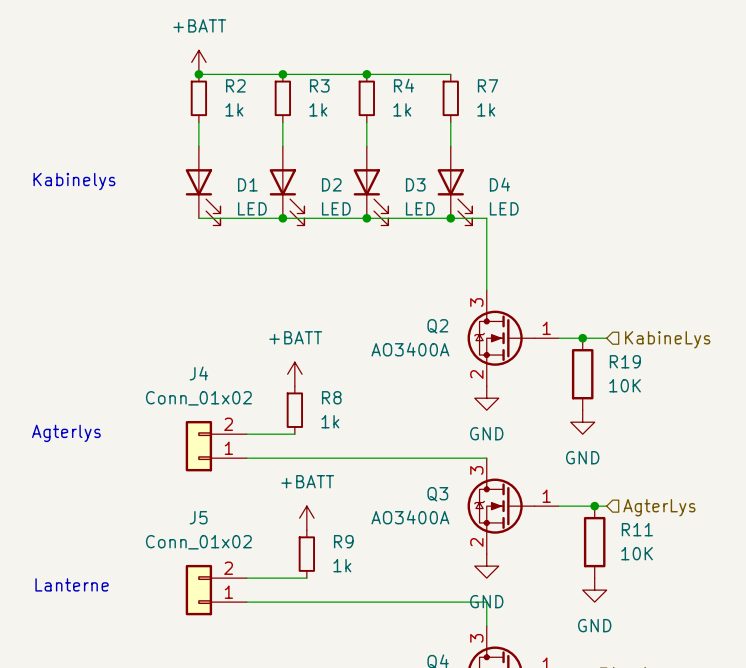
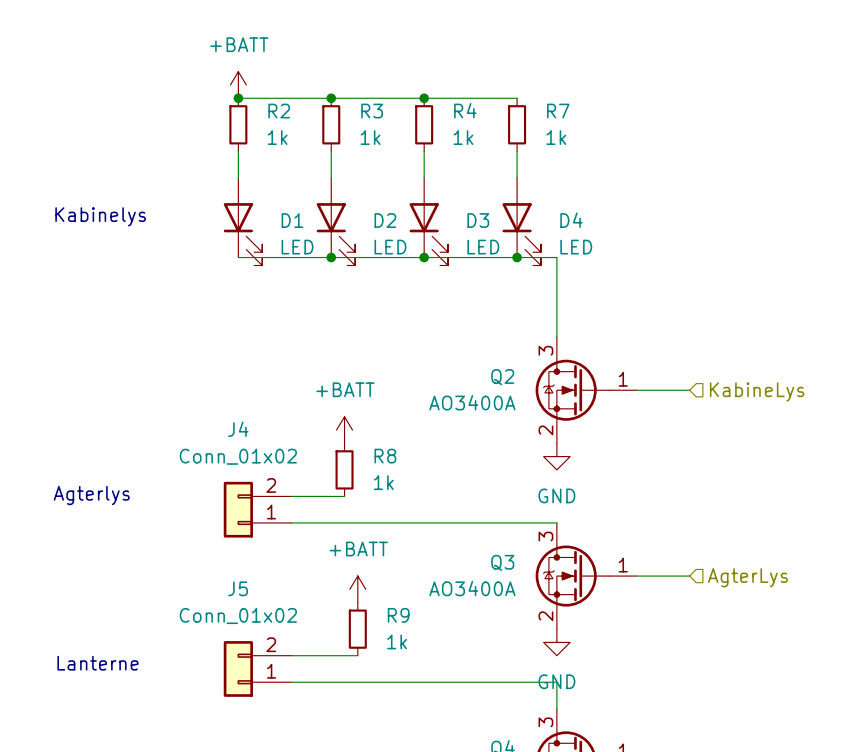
junction: (582, 338) -> none
R19: 10K (582, 374) -> none
power symbol: GND (582, 422) -> none
junction: (594, 506) -> none
R11: 10K (594, 542) -> none
power symbol: GND (594, 590) -> none

